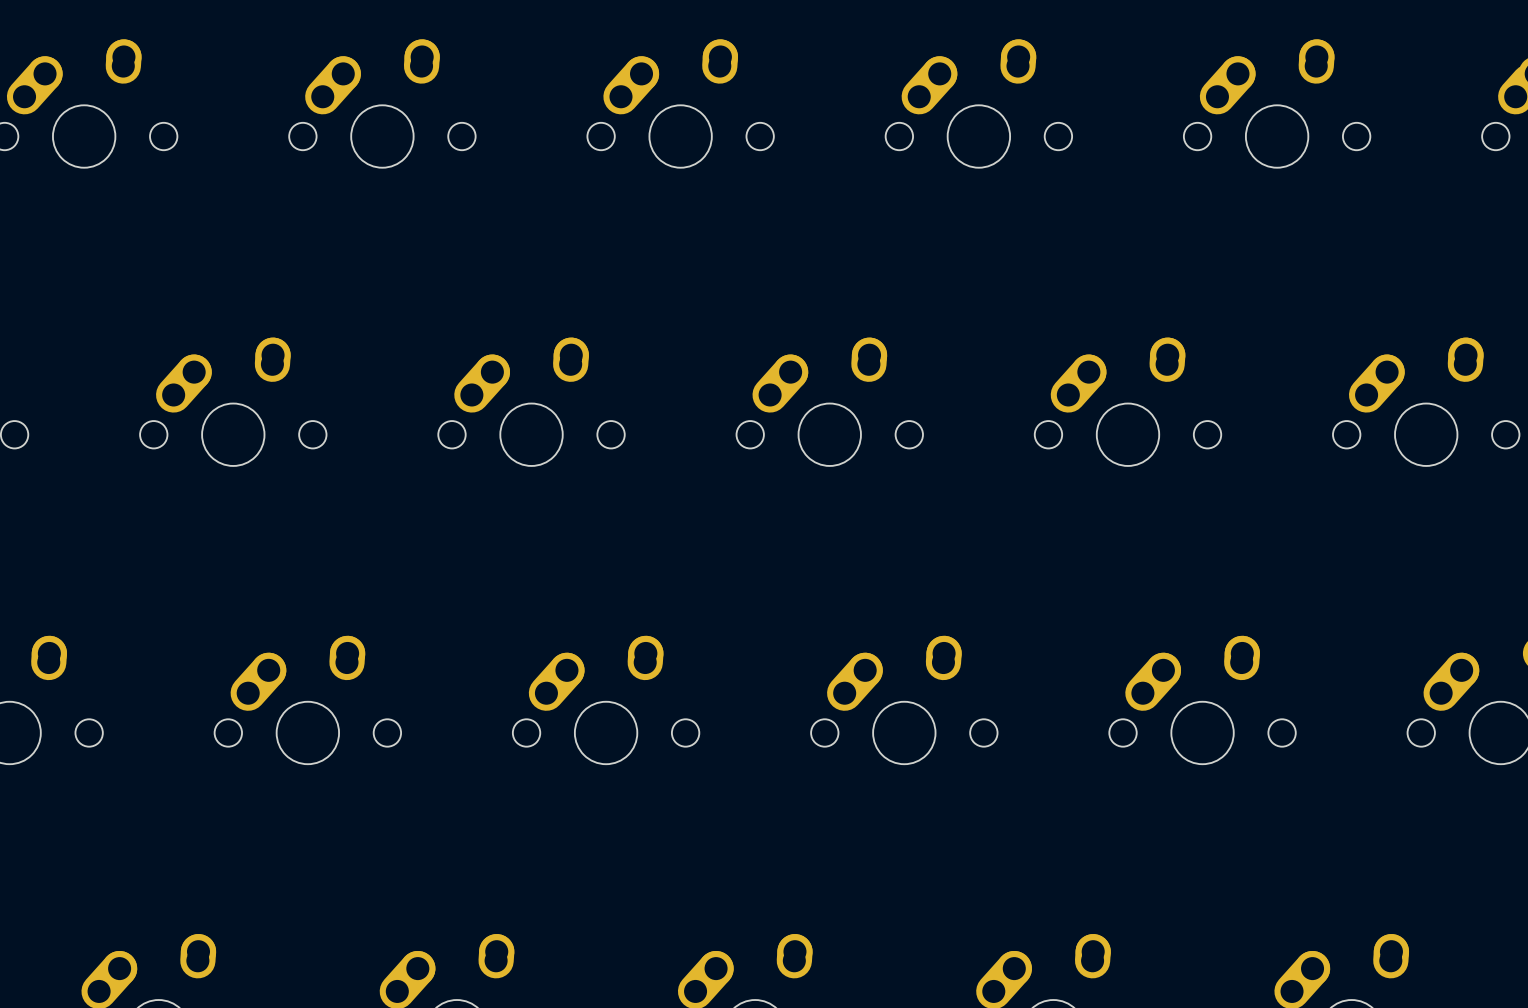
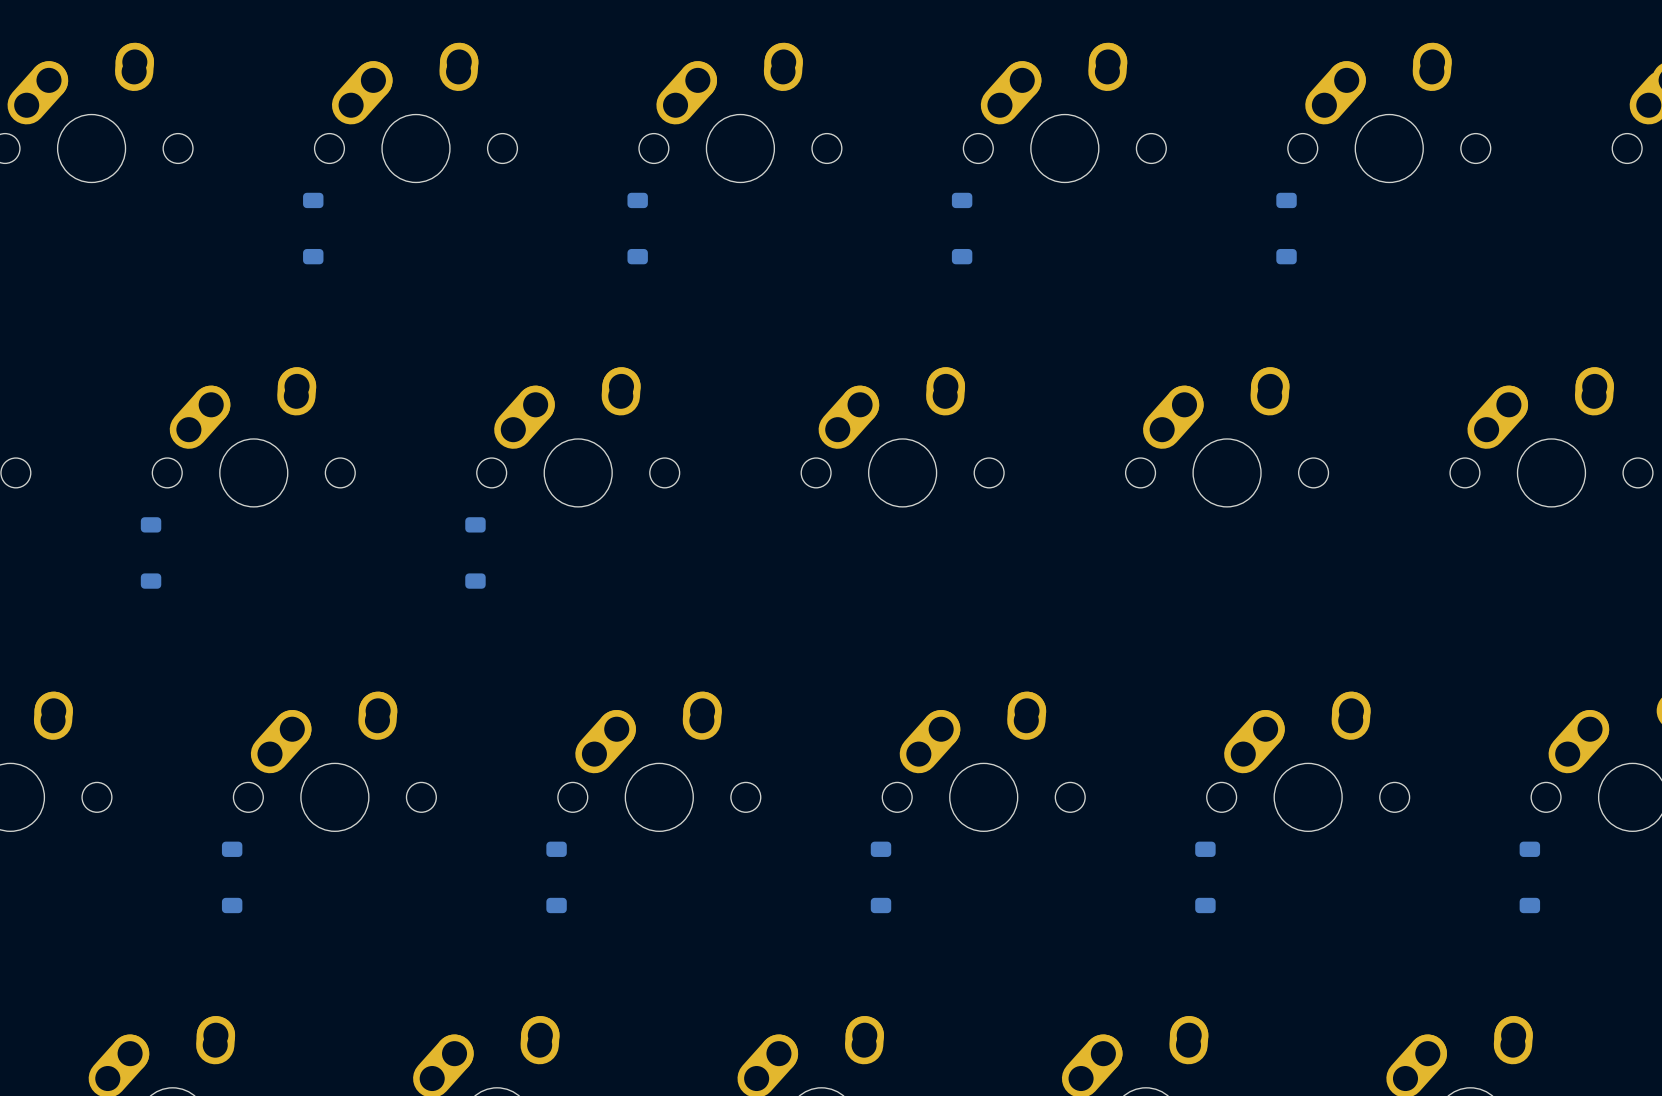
part: none -> (313, 228)
part: none -> (637, 228)
part: none -> (962, 228)
part: none -> (1286, 228)
part: none -> (151, 552)
part: none -> (475, 552)
part: none -> (232, 877)
part: none -> (556, 877)
part: none -> (881, 877)
part: none -> (1205, 877)
part: none -> (1529, 877)

